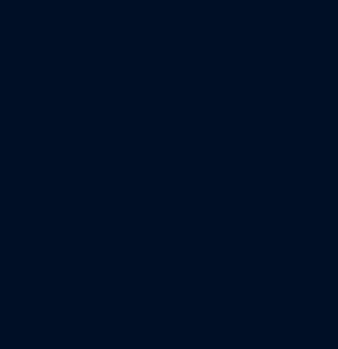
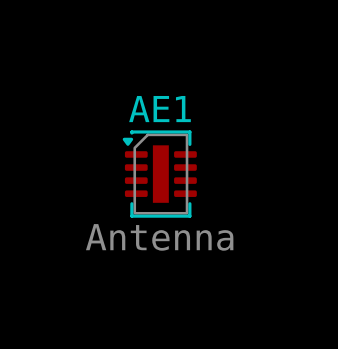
AE1: none -> Antenna (159, 174)

